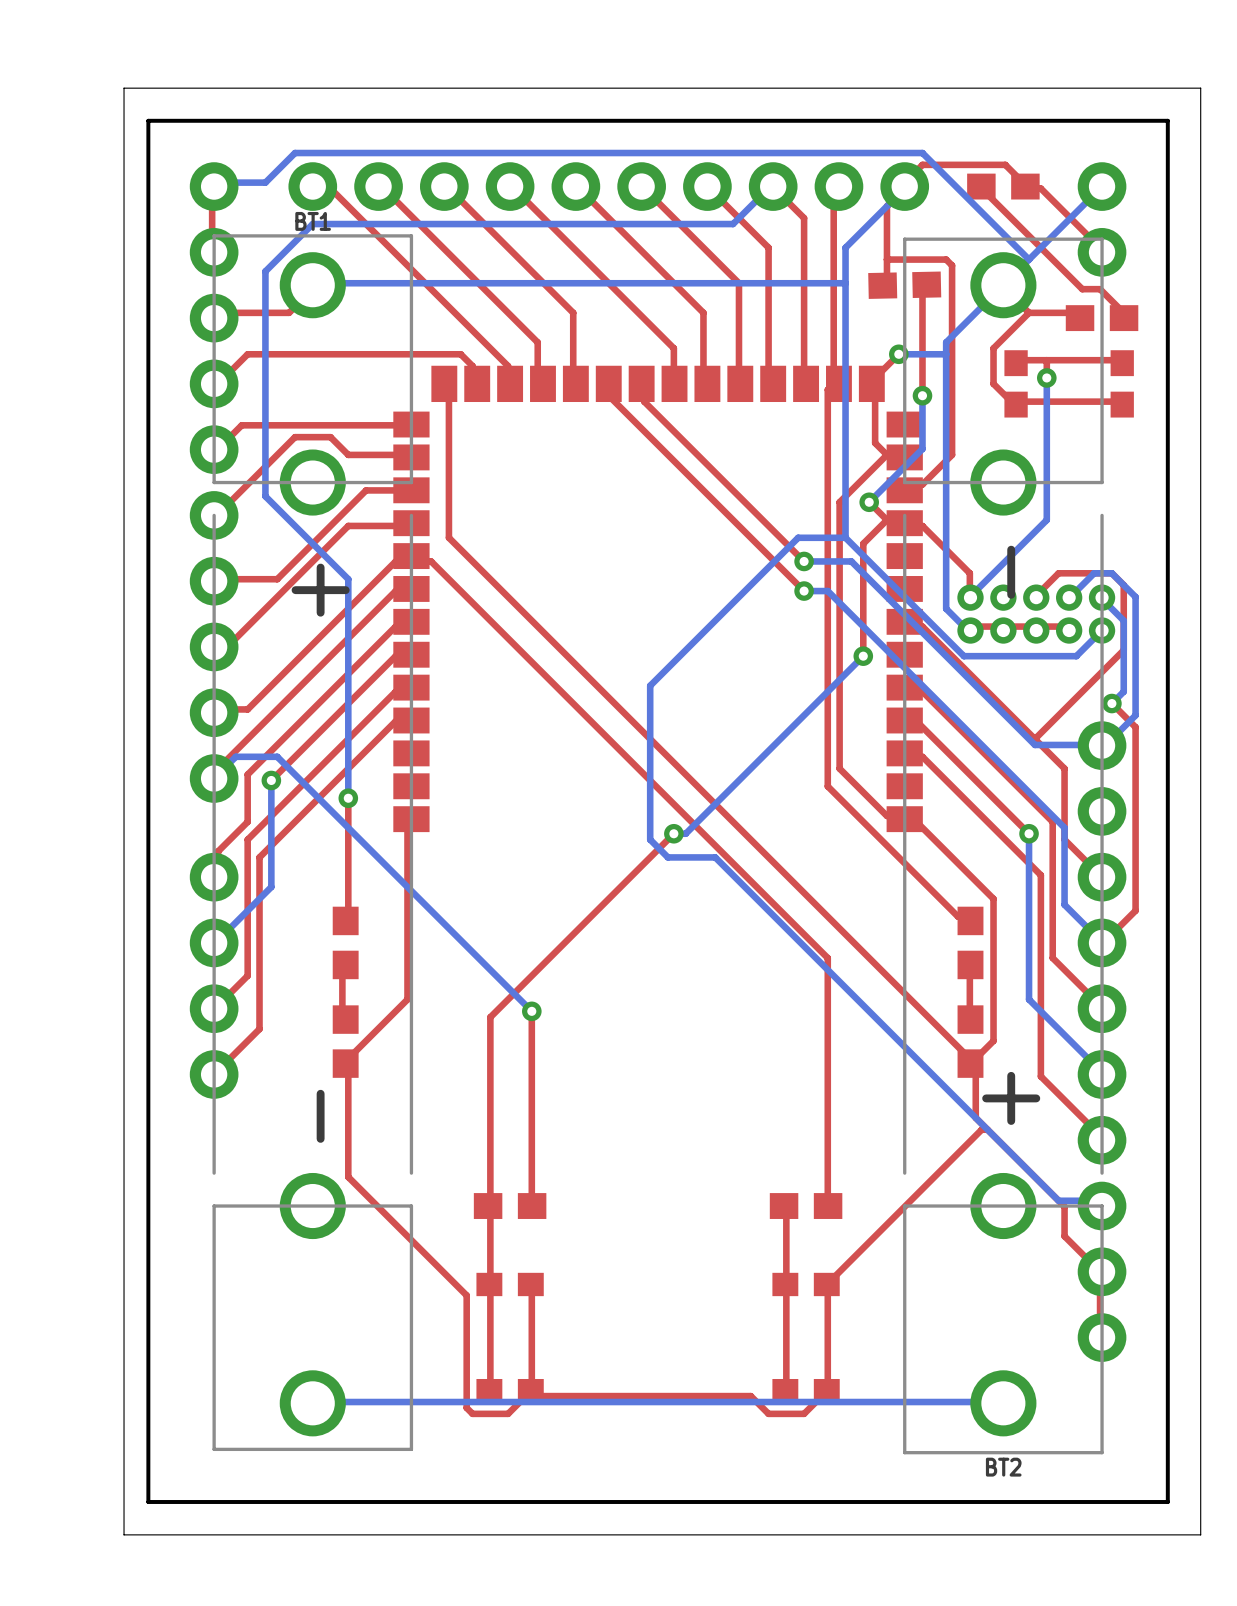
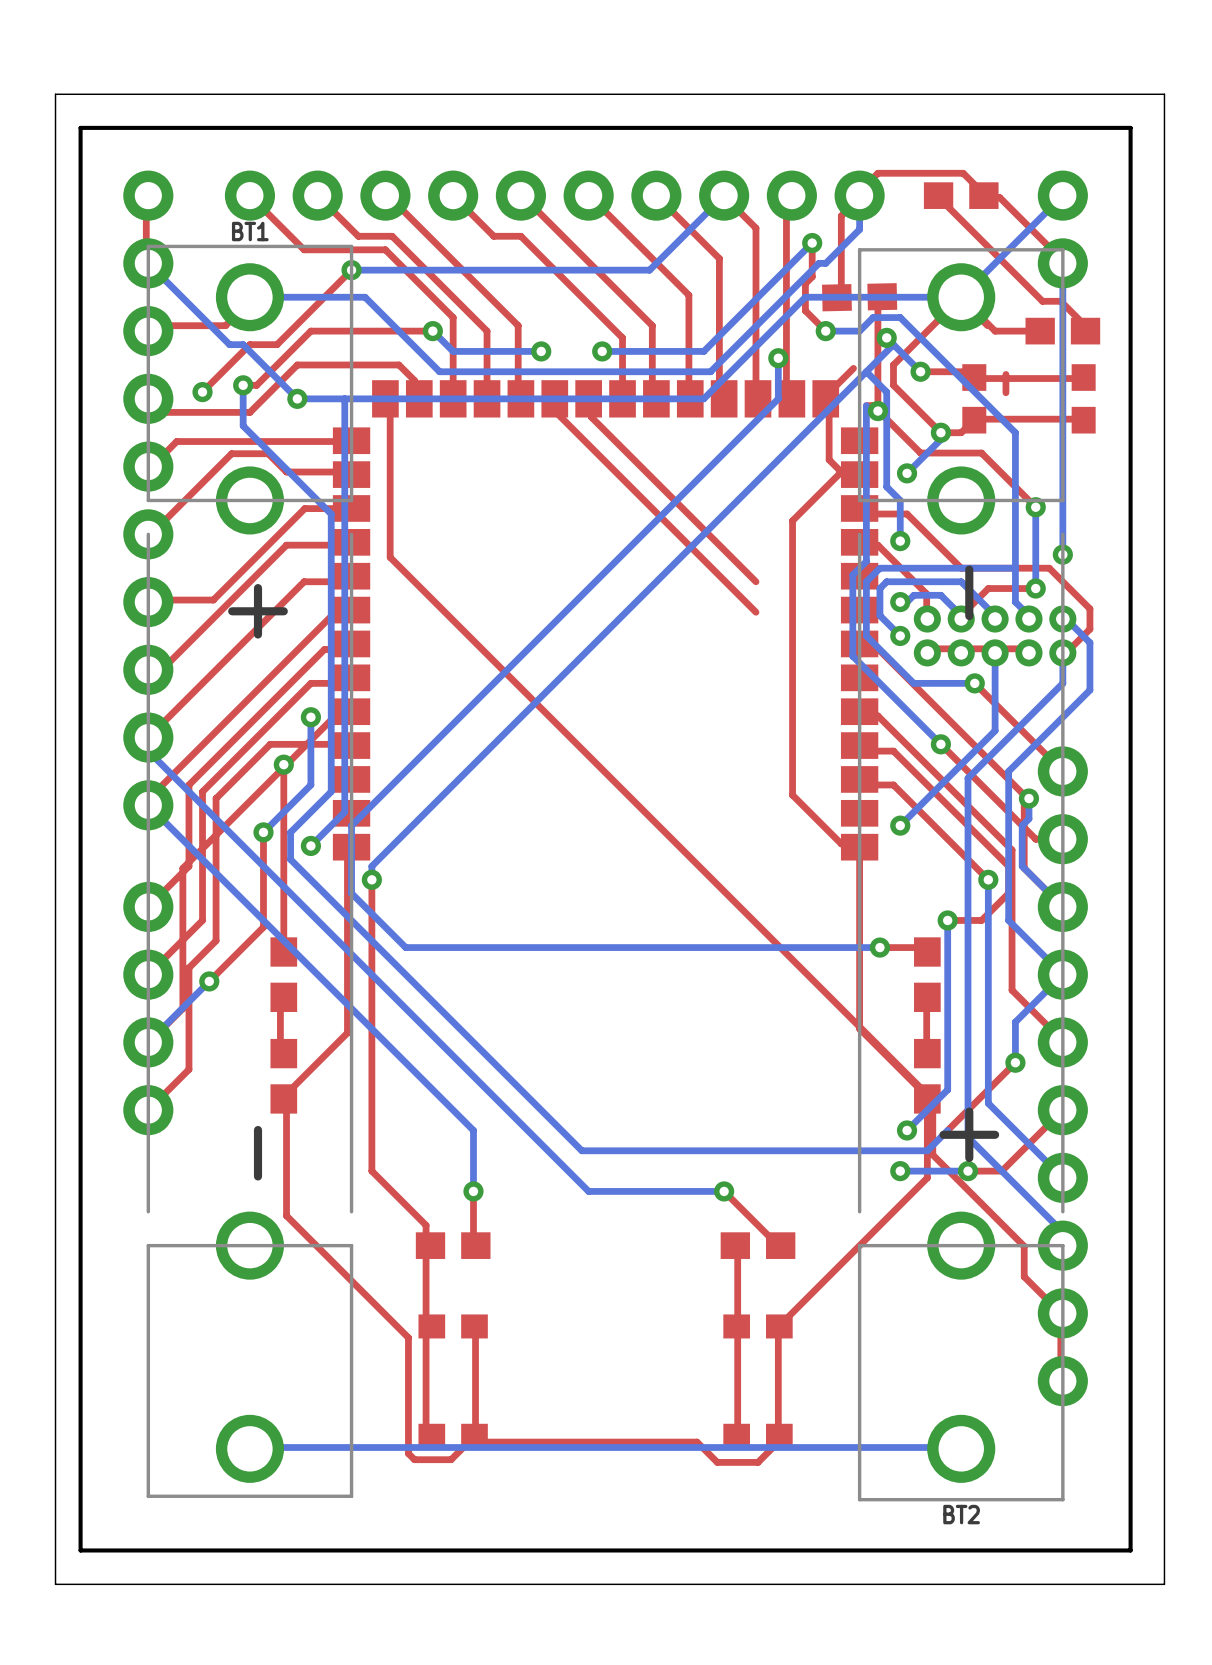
bottom track: (214, 186) (218, 182) (265, 182) (295, 153) (922, 153) (1029, 259) -> none
top track: (312, 186) (312, 188) (330, 188) (508, 366) (508, 383) (510, 383) -> (249, 195) (304, 249) (385, 249) (453, 317) (453, 398)
top track: (378, 186) (383, 188) (537, 342) (537, 383) (542, 383) -> (317, 195) (358, 236) (392, 236) (487, 331) (487, 398)
top track: (510, 186) (673, 348) (674, 383) -> (453, 195) (493, 236) (520, 236) (622, 337) (622, 398)
bottom track: (773, 186) (768, 188) (733, 224) (312, 224) (265, 271) (265, 496) (348, 579) (348, 798) -> (724, 195) (649, 270) (351, 270)
bottom track: (904, 188) (845, 247) (845, 537) -> none
top track: none -> (812, 243) (812, 276) (805, 283) (805, 310) (825, 331)
bottom track: none -> (812, 243) (703, 351) (602, 351)
via: none -> (812, 243)
bottom track: none -> (1062, 263) (1062, 554)
top track: none -> (351, 270) (277, 344) (249, 344) (202, 392)
via: none -> (351, 270)
top track: (886, 259) (946, 259) (952, 265) (952, 454) (922, 484) (904, 484) (904, 490) -> (1062, 652) (1062, 656) (1089, 629) (1089, 608) (1049, 568) (961, 568) (907, 514) (859, 514) (859, 508)
bottom track: (845, 283) (312, 283) (312, 285) -> (859, 197) (859, 229) (825, 263) (818, 263) (710, 371) (439, 371) (365, 297) (249, 297)
bottom track: (1003, 285) (946, 342) (946, 608) (963, 626) (969, 626) (970, 630) -> (961, 297) (805, 297) (703, 398) (297, 398) (243, 344) (229, 344) (148, 263)
top track: none -> (432, 331) (310, 331) (256, 385) (243, 385)
bottom track: none -> (432, 331) (453, 351) (541, 351)
via: none -> (432, 331)
via: none -> (825, 331)
top track: (1080, 318) (1076, 312) (1029, 312) (993, 348) (993, 383) (1016, 404) (1017, 401) (1117, 401) (1122, 404) -> (1040, 331) (995, 331) (961, 297) (893, 364) (893, 385) (940, 432) (961, 432) (974, 419) (1083, 420)
bottom track: none -> (886, 337) (920, 371)
via: none -> (886, 337)
bottom track: none -> (893, 344) (371, 866) (371, 879)
via: none -> (541, 351)
via: none -> (602, 351)
bottom track: none -> (778, 358) (778, 398) (351, 825) (351, 893) (405, 947) (879, 947)
via: none -> (778, 358)
top track: (460, 354) (247, 354) (218, 383) (214, 383) -> (402, 368) (398, 364) (297, 364) (249, 412) (161, 412) (148, 398)
via: (898, 354) -> none
bottom track: (946, 354) (898, 354) -> none
bottom track: none -> (866, 371) (886, 392) (886, 486) (900, 500) (900, 541)
via: none -> (920, 371)
top track: (1122, 363) (1117, 360) (1017, 360) (1016, 363) -> (1083, 377) (974, 378) (968, 371) (920, 371)
bottom track: none -> (243, 385) (243, 425) (331, 514) (331, 791) (290, 832) (290, 859) (581, 1150) (927, 1150) (947, 1130)
via: none -> (243, 385)
via: none -> (202, 392)
bottom track: (1046, 377) (1046, 520) (970, 597) -> none
via: (1046, 377) -> none
via: none -> (297, 398)
bottom track: none -> (344, 398) (344, 812) (310, 845)
top track: (833, 383) (827, 389) (827, 786) (958, 916) -> (879, 947) (914, 947)
top track: none -> (866, 405) (873, 405) (920, 453) (981, 453) (1035, 507)
bottom track: none -> (866, 405) (866, 561) (852, 574) (852, 656) (940, 744)
bottom track: (922, 395) (922, 448) (869, 502) -> none
bottom track: none -> (940, 432) (940, 439) (907, 473)
via: none -> (940, 432)
via: none -> (907, 473)
bottom track: none -> (1035, 507) (1035, 588)
via: none -> (1035, 507)
top track: (869, 502) (886, 520) -> none
via: (869, 502) -> none
top track: (886, 520) (863, 543) (863, 656) -> none
via: none -> (900, 541)
via: none -> (1062, 554)
bottom track: (845, 537) (798, 537) (650, 685) (650, 839) (667, 857) (715, 857) (1058, 1200) (1100, 1200) (1102, 1206) -> (1062, 652) (1062, 683) (968, 778) (968, 1137) (1062, 1232) (1062, 1245)
bottom track: (845, 537) (963, 656) (1076, 656) (1102, 630) -> none
bottom track: none -> (1015, 568) (879, 568) (866, 581) (866, 635) (913, 683) (974, 683)
top track: (395, 561) (247, 709) (218, 709) (214, 712) -> (335, 581) (304, 581) (148, 737)
top track: (407, 561) (411, 556) (413, 561) (431, 561) (827, 958) (828, 1206) -> (724, 1191) (778, 1245) (780, 1245)
bottom track: (804, 561) (851, 561) (1034, 744) (1105, 744) (1135, 715) (1135, 596) (1111, 573) (1094, 573) (1069, 597) -> (825, 331) (859, 331) (873, 317) (900, 317) (1015, 432) (1015, 602) (1028, 615) (1028, 619)
via: (804, 561) -> none
top track: none -> (1035, 588) (988, 588) (961, 615) (961, 619)
via: none -> (1035, 588)
bottom track: none -> (900, 602) (907, 602) (913, 595) (940, 595) (961, 615) (961, 619)
via: none -> (900, 602)
bottom track: (804, 591) (827, 591) (1064, 827) (1064, 904) (1102, 942) -> none
via: (804, 591) -> none
top track: (1036, 597) (1040, 596) (1040, 591) (1058, 573) (1111, 573) (1123, 585) (1123, 650) (1034, 739) -> none
bottom track: none -> (995, 619) (995, 615) (961, 581) (886, 581) (879, 588) (879, 615) (900, 635)
bottom track: (1102, 597) (1123, 620) (1123, 691) (1111, 703) -> (1062, 619) (1062, 622) (1069, 622) (1089, 642) (1089, 690) (1008, 771) (1008, 920) (1062, 974) (1015, 1022) (1015, 1062)
via: none -> (900, 635)
top track: (411, 621) (407, 626) (395, 626) (247, 774) (247, 821) (218, 851) (218, 875) (214, 877) -> (351, 643) (351, 649) (324, 649) (188, 784) (188, 866) (148, 906)
bottom track: none -> (995, 652) (995, 730) (900, 825)
top track: (411, 654) (395, 656) (332, 719) -> (351, 745) (270, 744)
top track: none -> (351, 677) (351, 683) (310, 683) (202, 791) (202, 920) (148, 974)
bottom track: (863, 656) (685, 833) (673, 833) -> none
via: (863, 656) -> none
top track: none -> (974, 683) (1062, 771)
via: none -> (974, 683)
bottom track: none -> (310, 717) (310, 784) (263, 832)
via: none -> (310, 717)
top track: (1111, 703) (1135, 727) (1135, 910) (1102, 942) -> none
via: (1111, 703) -> none
bottom track: none -> (148, 737) (148, 751) (588, 1191) (724, 1191)
top track: none -> (940, 744) (1035, 839) (1062, 839)
via: none -> (940, 744)
top track: (411, 720) (395, 721) (259, 857) (259, 1029) (253, 1035) -> (216, 798) (216, 940) (188, 967) (188, 1069)
top track: (904, 721) (916, 721) (1029, 833) -> (859, 746) (859, 751) (893, 751) (1008, 866) (1008, 893) (981, 920) (947, 920)
via: none -> (283, 764)
top track: (904, 756) (922, 756) (1040, 875) (1040, 1076) (1100, 1135) (1102, 1140) -> (859, 782) (859, 784) (893, 784) (988, 879)
bottom track: none -> (1028, 798) (1028, 818) (1022, 825) (1022, 866) (1062, 906)
via: none -> (1028, 798)
bottom track: (214, 778) (235, 756) (277, 756) (531, 1011) -> (148, 805) (473, 1130) (473, 1191)
bottom track: (271, 780) (271, 887) (214, 942) -> none
via: (271, 780) -> none
top track: (348, 798) (348, 916) (345, 920) -> (283, 764) (283, 951)
via: (348, 798) -> none
via: none -> (900, 825)
top track: none -> (263, 832) (263, 927) (209, 981)
via: none -> (263, 832)
via: none -> (310, 845)
top track: (904, 821) (916, 821) (993, 898) (993, 1040) (970, 1063) -> none
top track: (673, 833) (490, 1017) (490, 1200) (488, 1206) (490, 1206) (489, 1390) -> (371, 879) (371, 1171) (426, 1225) (426, 1320) (431, 1326) (426, 1326) (426, 1435) (431, 1435)
via: (673, 833) -> none
bottom track: (1029, 833) (1029, 999) (1102, 1074) -> none
via position: (1029, 833) -> (988, 879)
via: none -> (371, 879)
bottom track: none -> (988, 879) (988, 1103) (1062, 1177)
bottom track: none -> (947, 920) (947, 1089) (907, 1130)
via: none -> (947, 920)
via: none -> (879, 947)
bottom track: none -> (209, 981) (148, 1042)
via: none -> (209, 981)
top track: (531, 1011) (532, 1206) -> (473, 1191) (473, 1245) (475, 1245)
via: (531, 1011) -> none
top track: none -> (1015, 1062) (947, 1130)
via: none -> (1015, 1062)
top track: none -> (1062, 1110) (1001, 1171) (968, 1171)
via: none -> (907, 1130)
top track: (987, 1129) (981, 1129) (826, 1284) (827, 1390) (804, 1413) (768, 1413) (750, 1396) (531, 1396) (530, 1390) -> (859, 850) (859, 1028) (927, 1096) (927, 1177) (778, 1326) (778, 1442) (758, 1462) (717, 1462) (697, 1442) (480, 1442) (474, 1435)
via: none -> (900, 1171)
bottom track: none -> (968, 1171) (900, 1171)
via: none -> (968, 1171)
via: none -> (473, 1191)
via: none -> (724, 1191)

